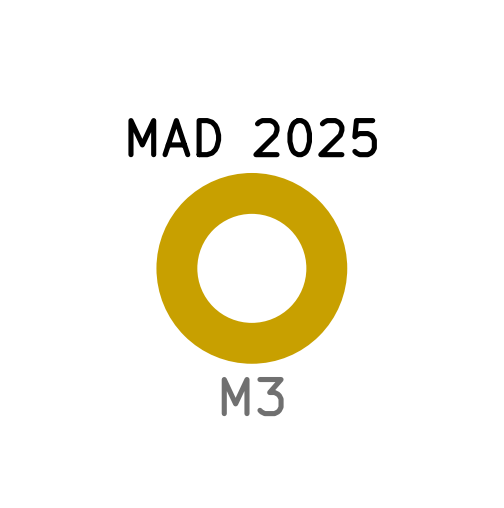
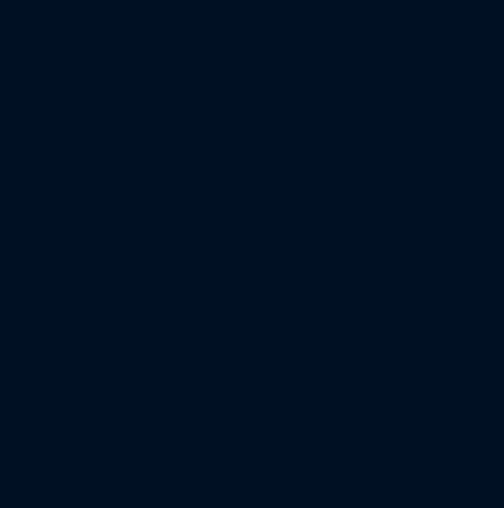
MAD 2025: M3 (251, 268) -> none

